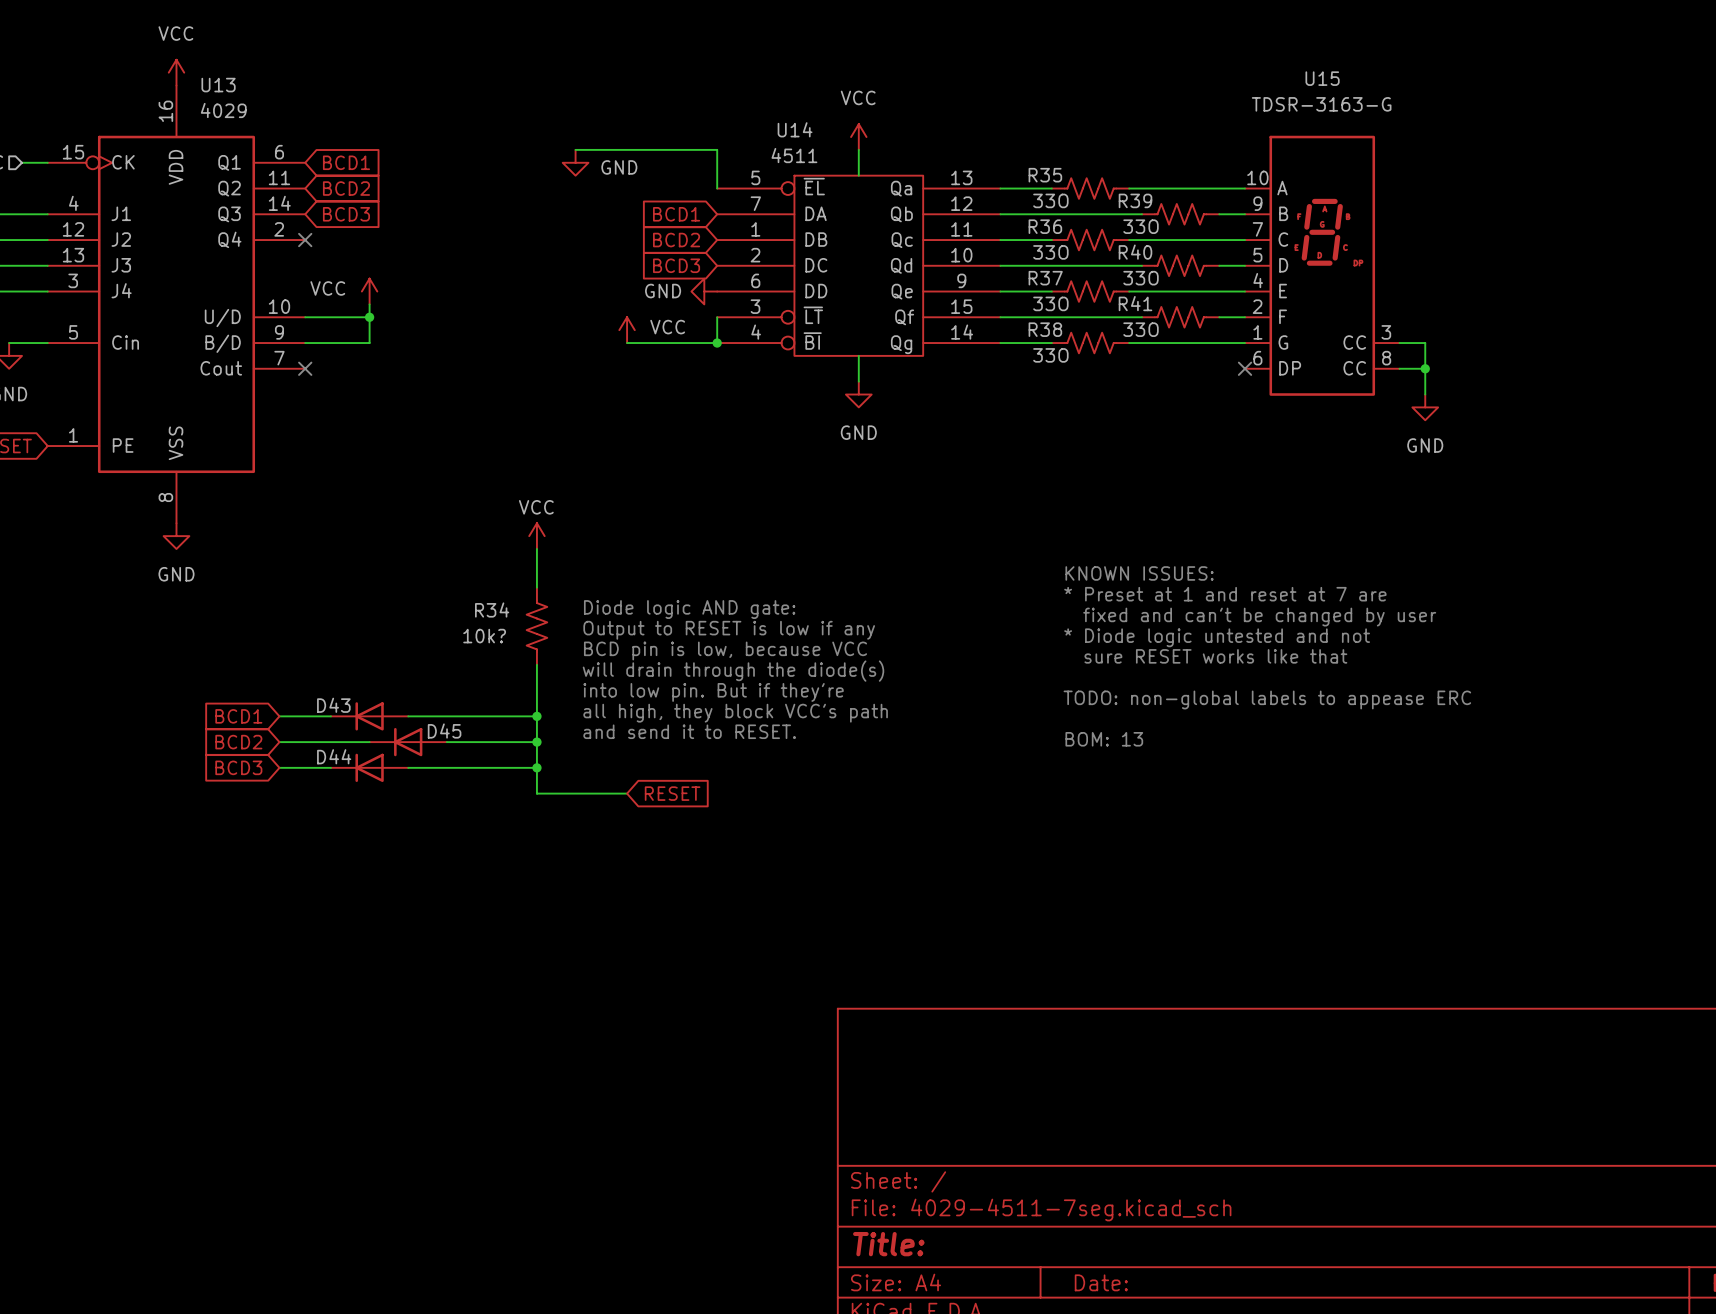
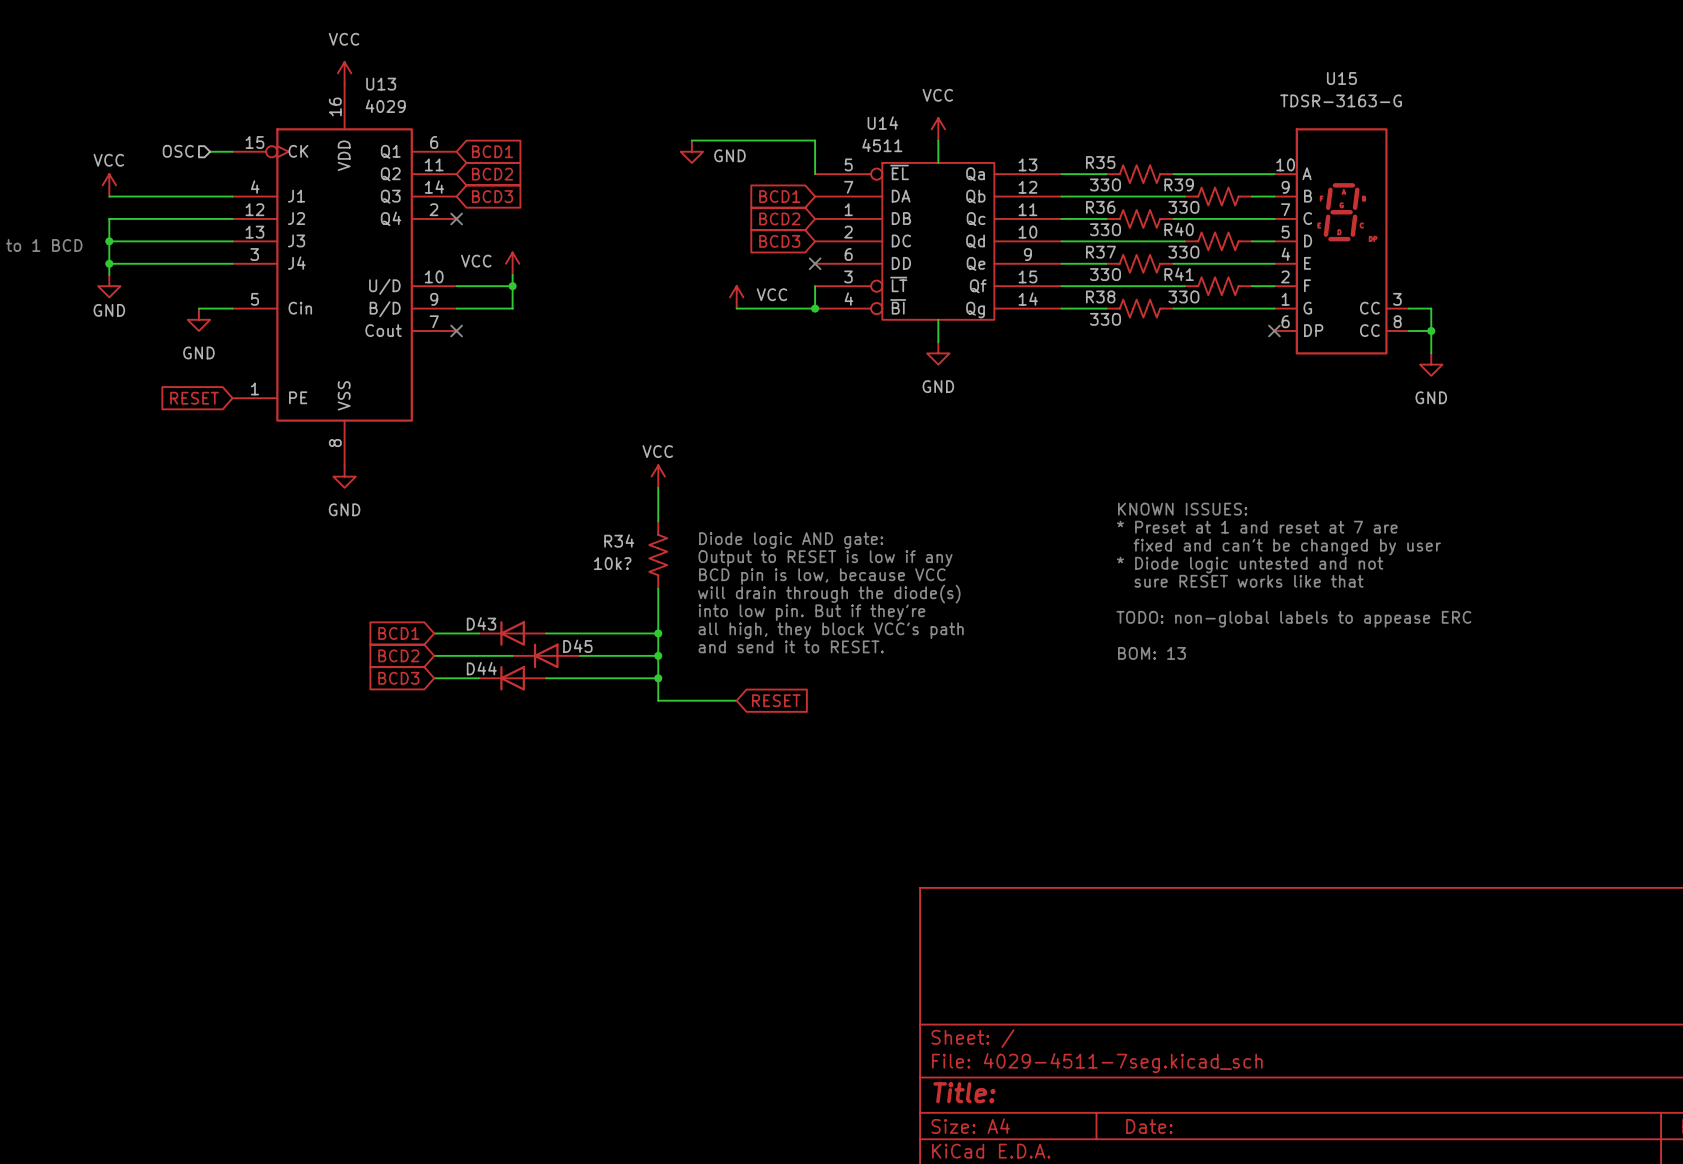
power symbol: GND (704, 291) -> none
no-connect mark: none -> (815, 263)

